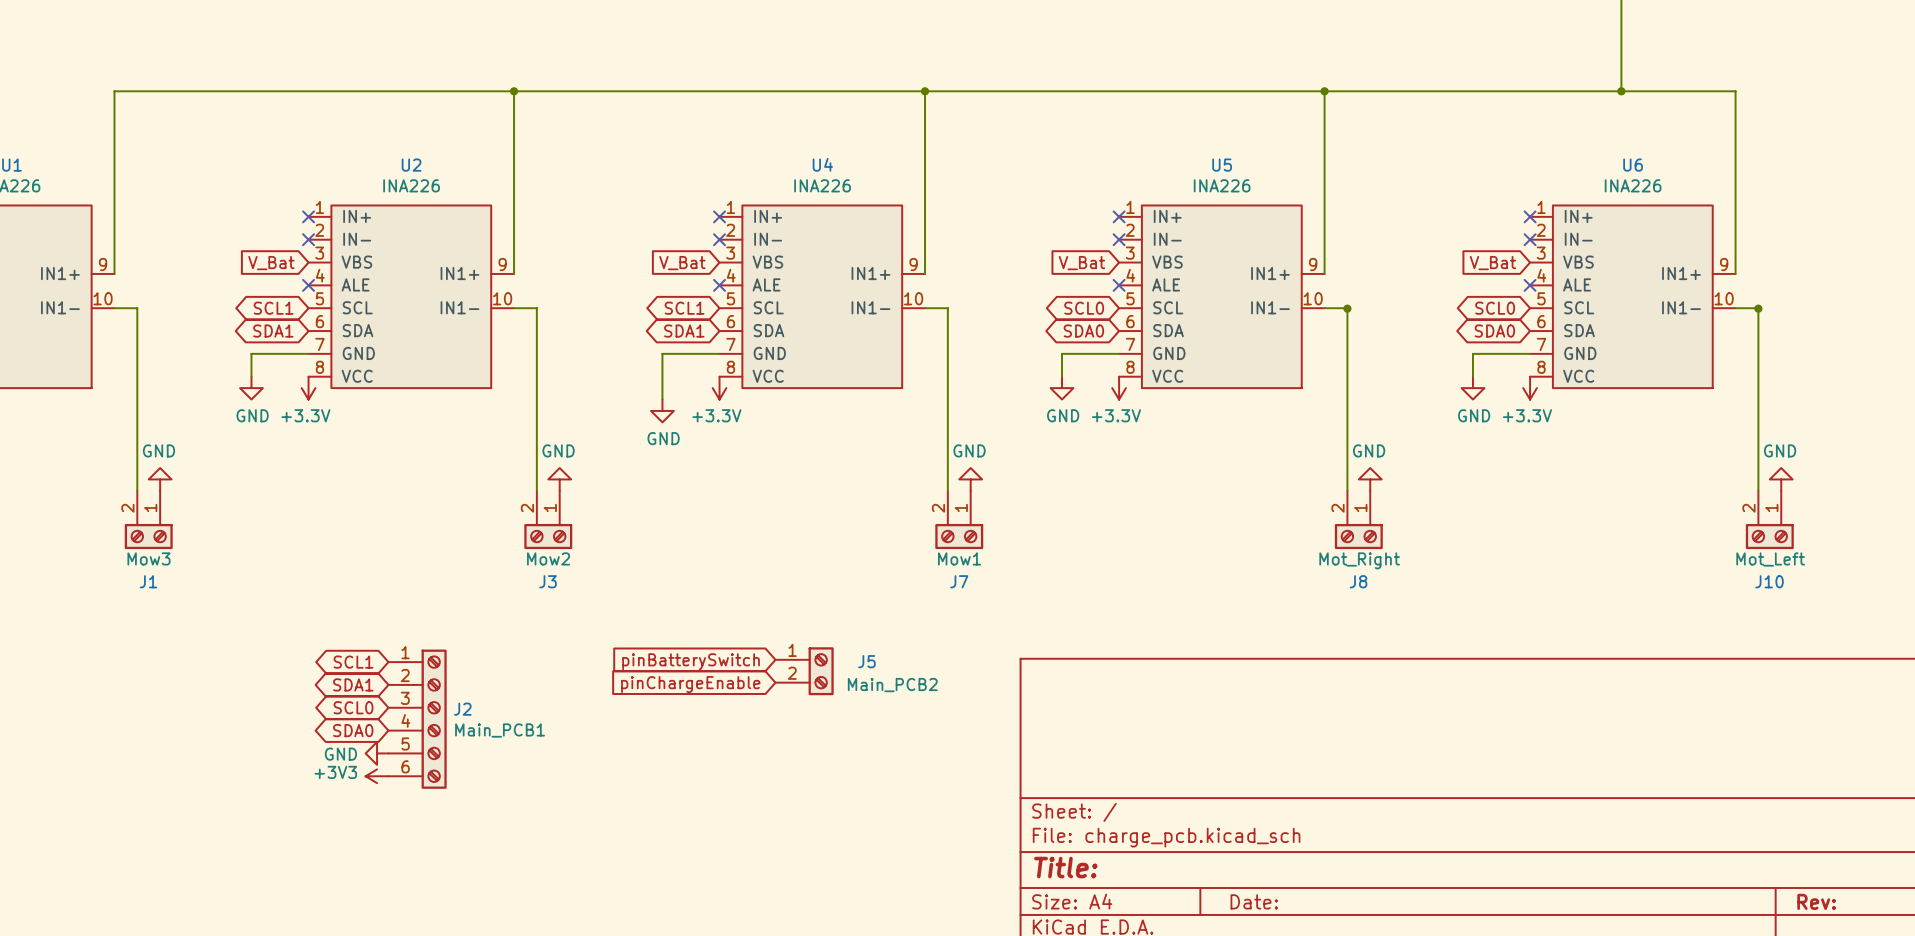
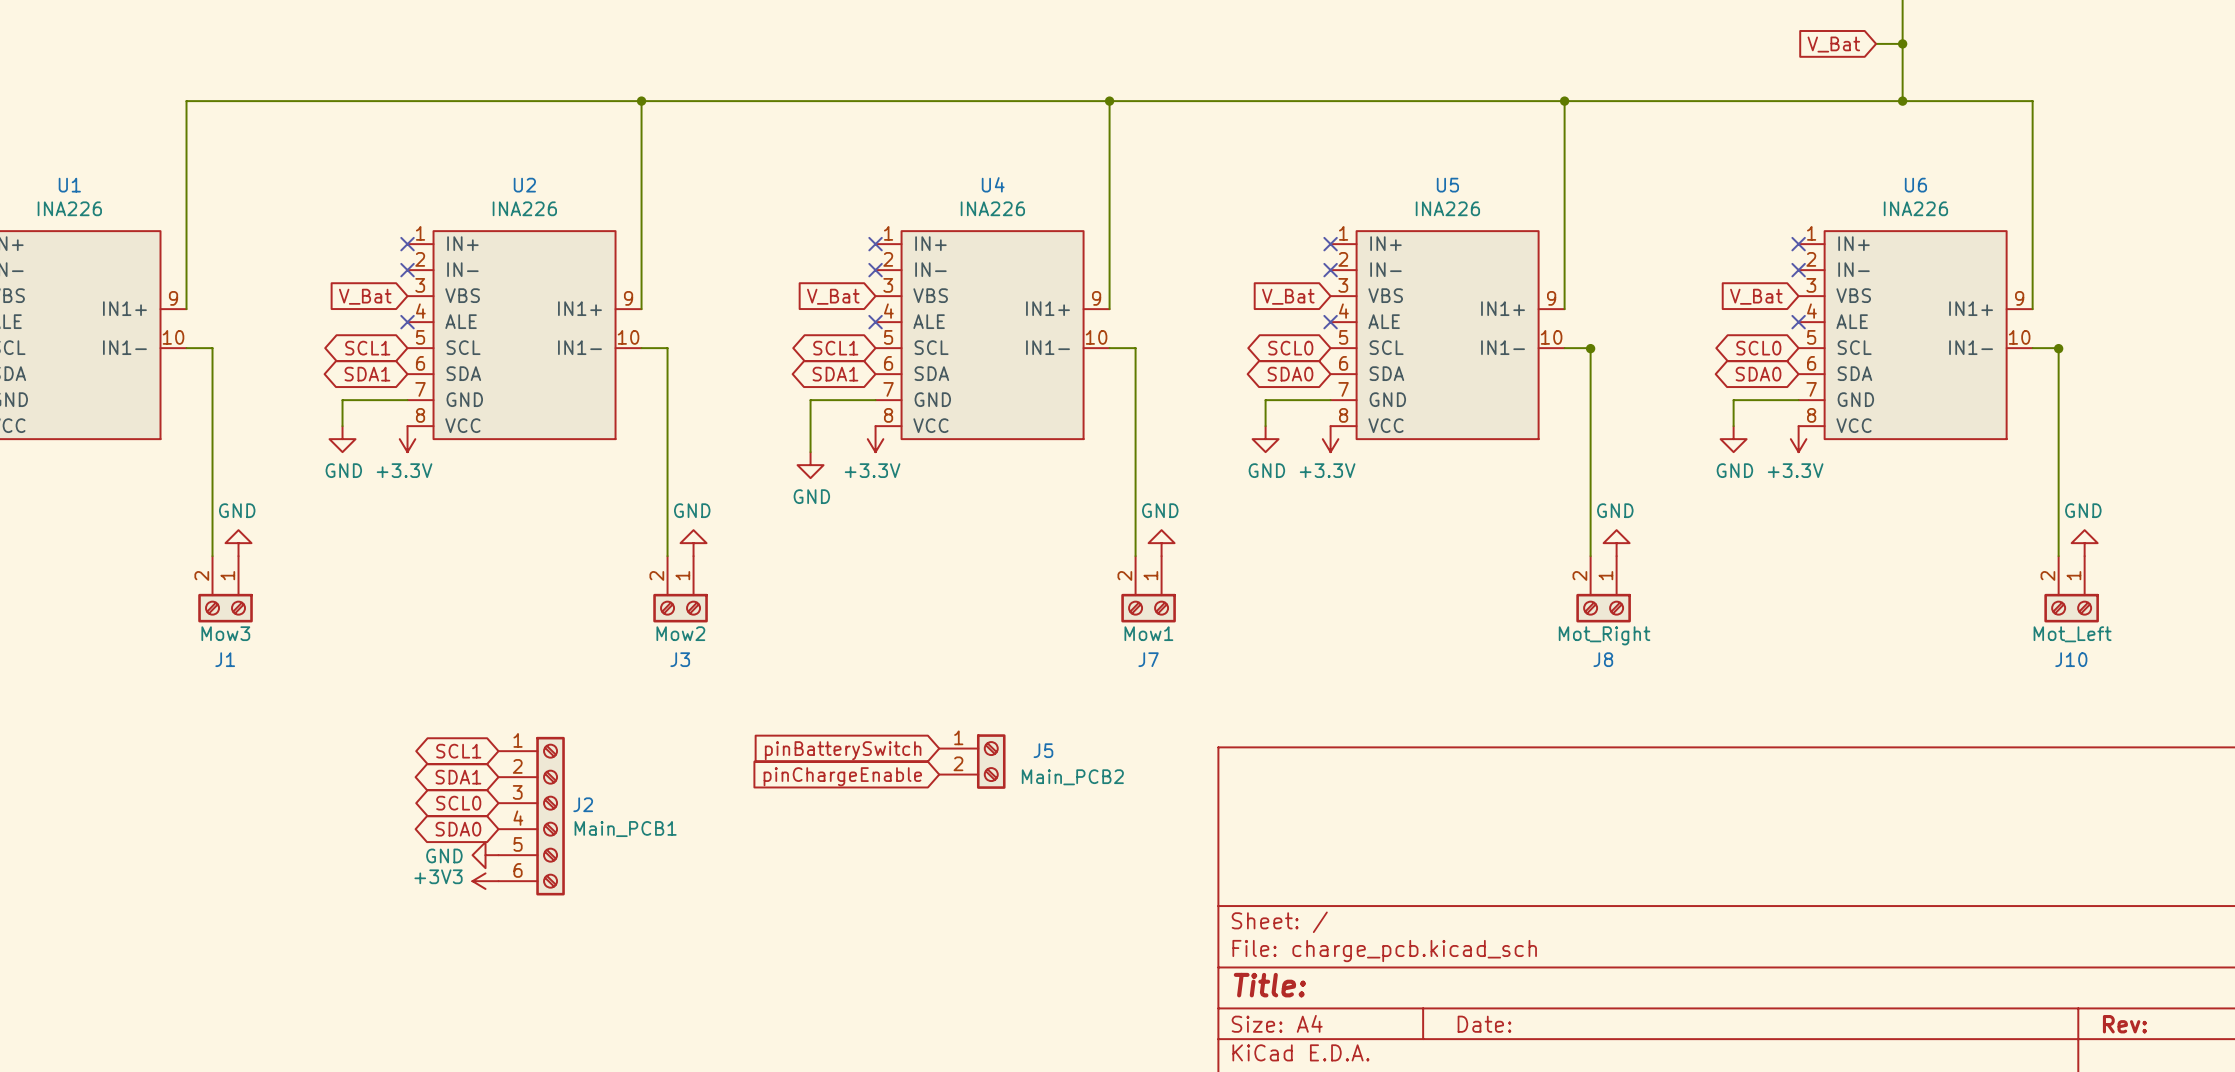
global label: none -> V_Bat (1833, 44)
wire: none -> (1876, 43) (1902, 43)
junction: none -> (1902, 43)

